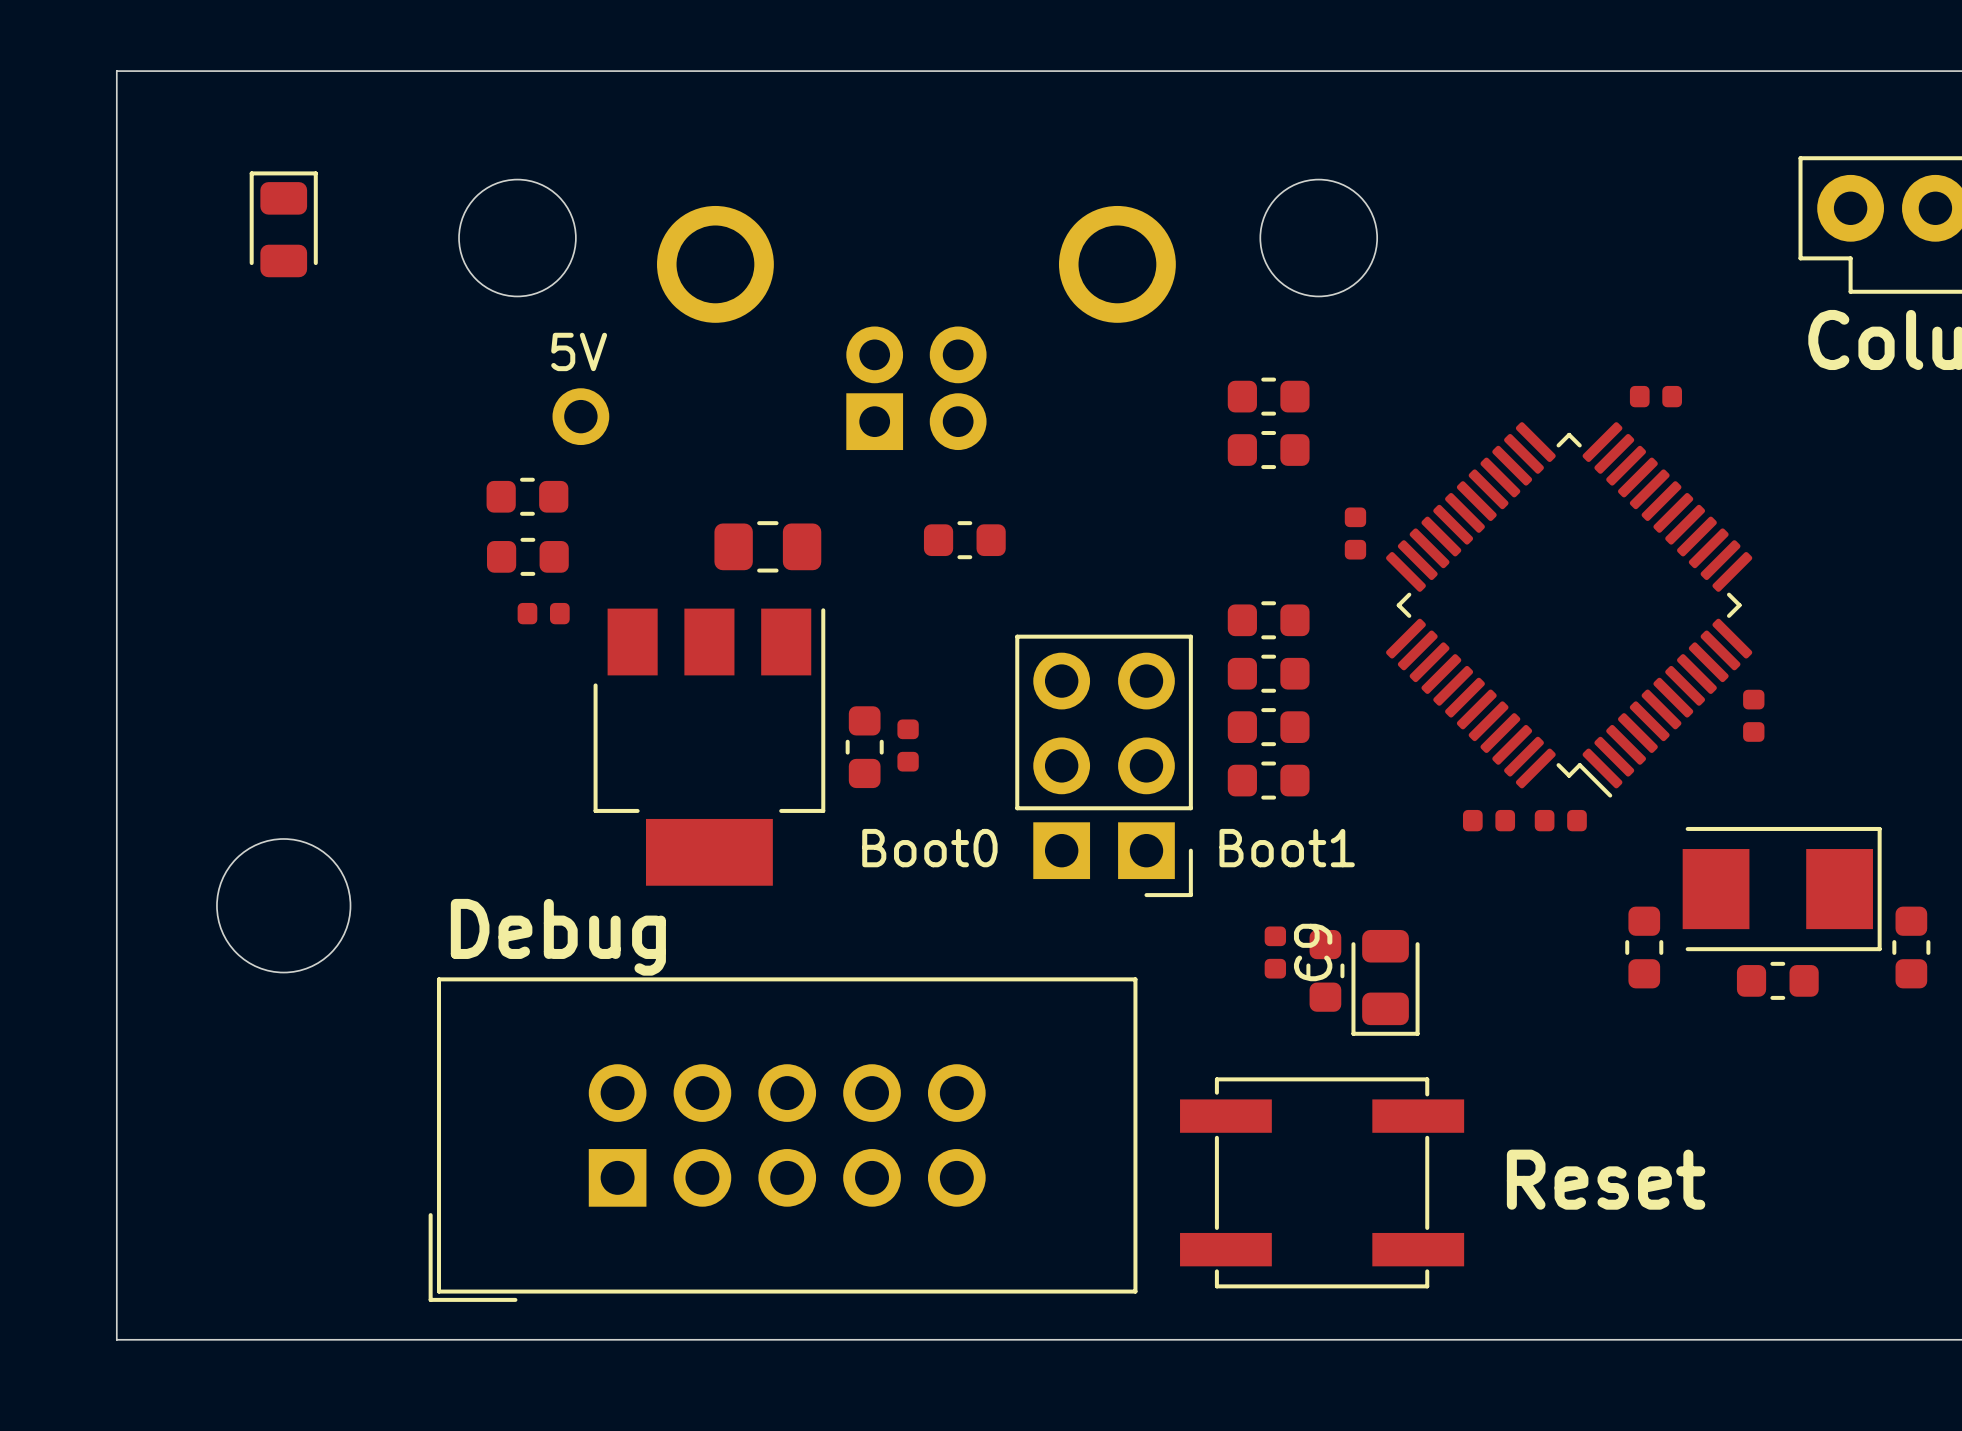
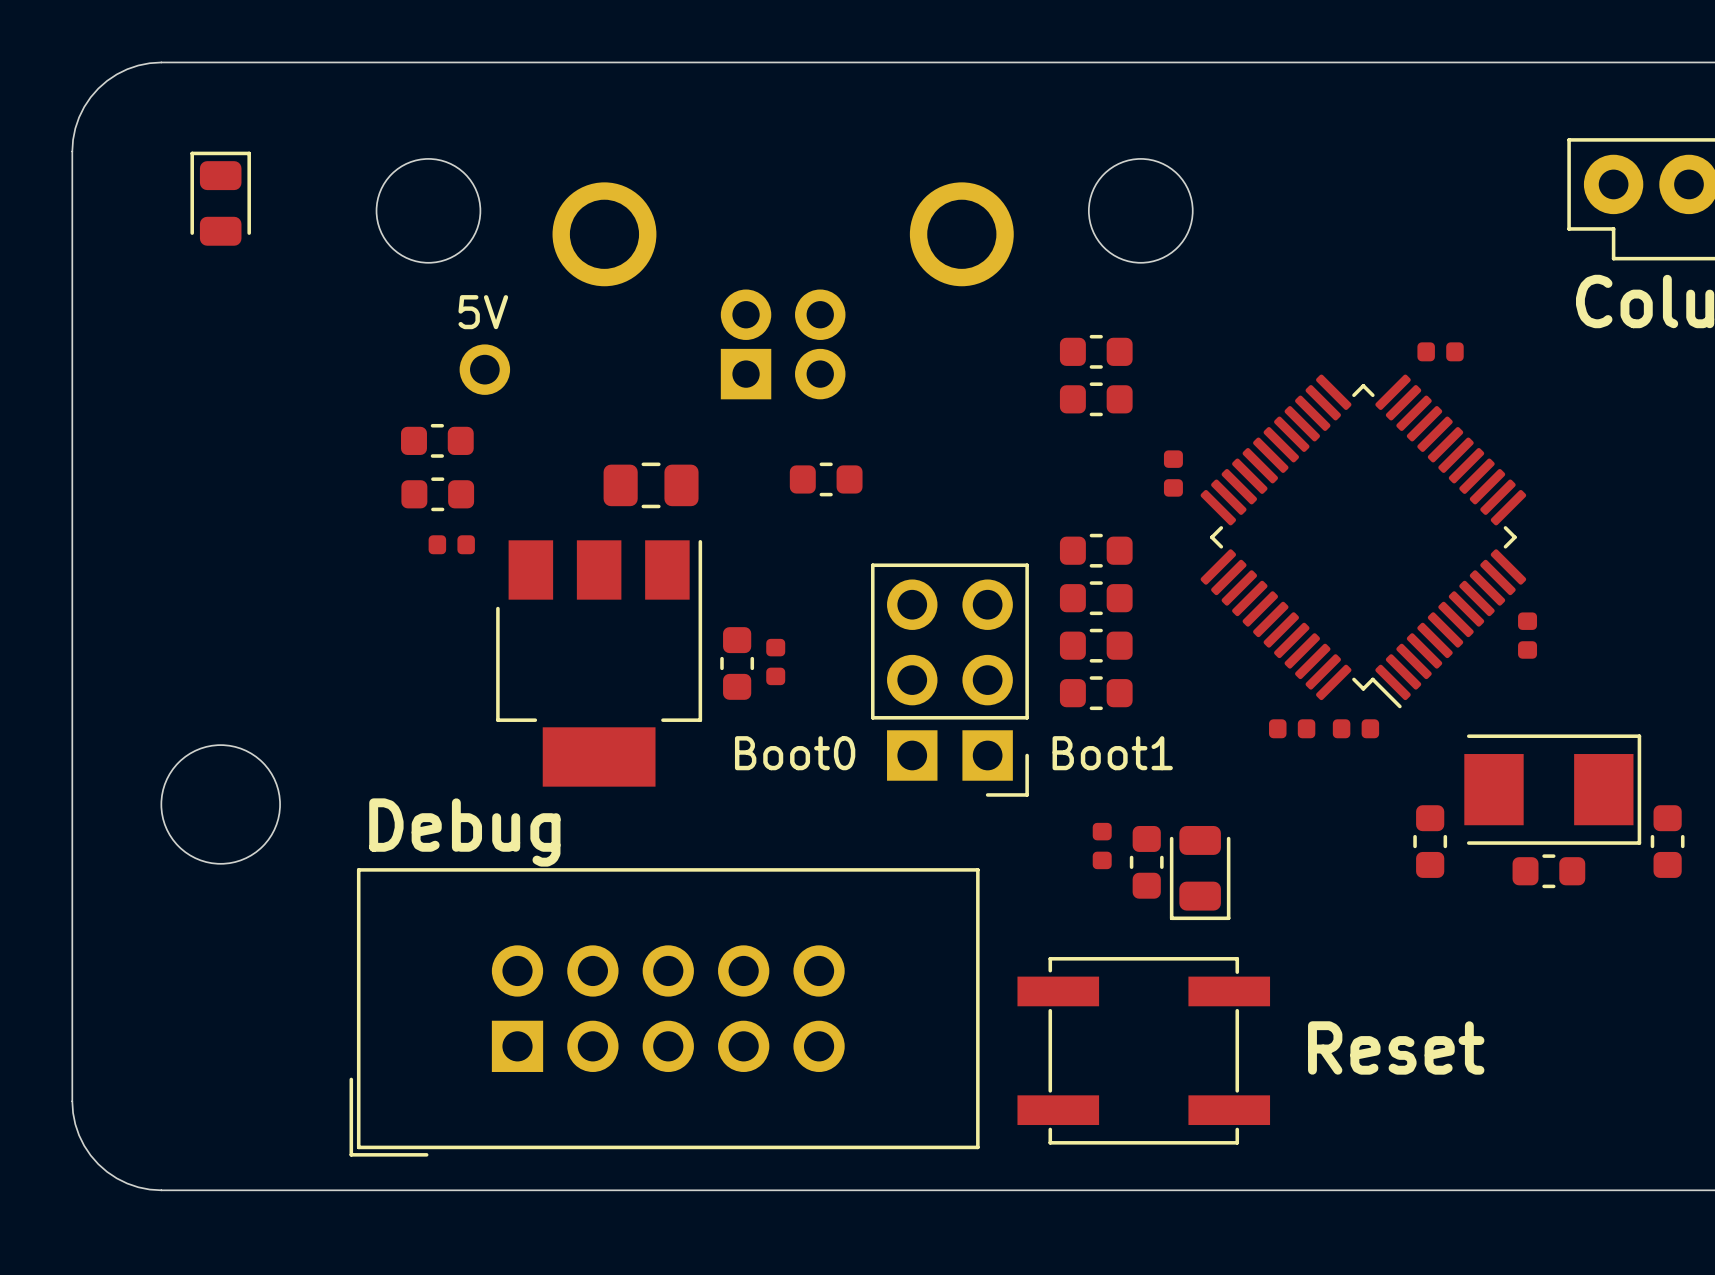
board edge: (216, 71) (116, 71) (116, 171) -> (161, 62) (138, 65) (127, 69) (116, 74) (98, 88) (84, 106) (79, 117) (73, 139) (72, 151)
C9 name: C9 (1313, 952) -> none
board edge: (116, 1239) (116, 1339) (216, 1339) -> (72, 1101) (75, 1124) (79, 1135) (84, 1145) (98, 1164) (116, 1178) (127, 1183) (138, 1187) (161, 1190)

